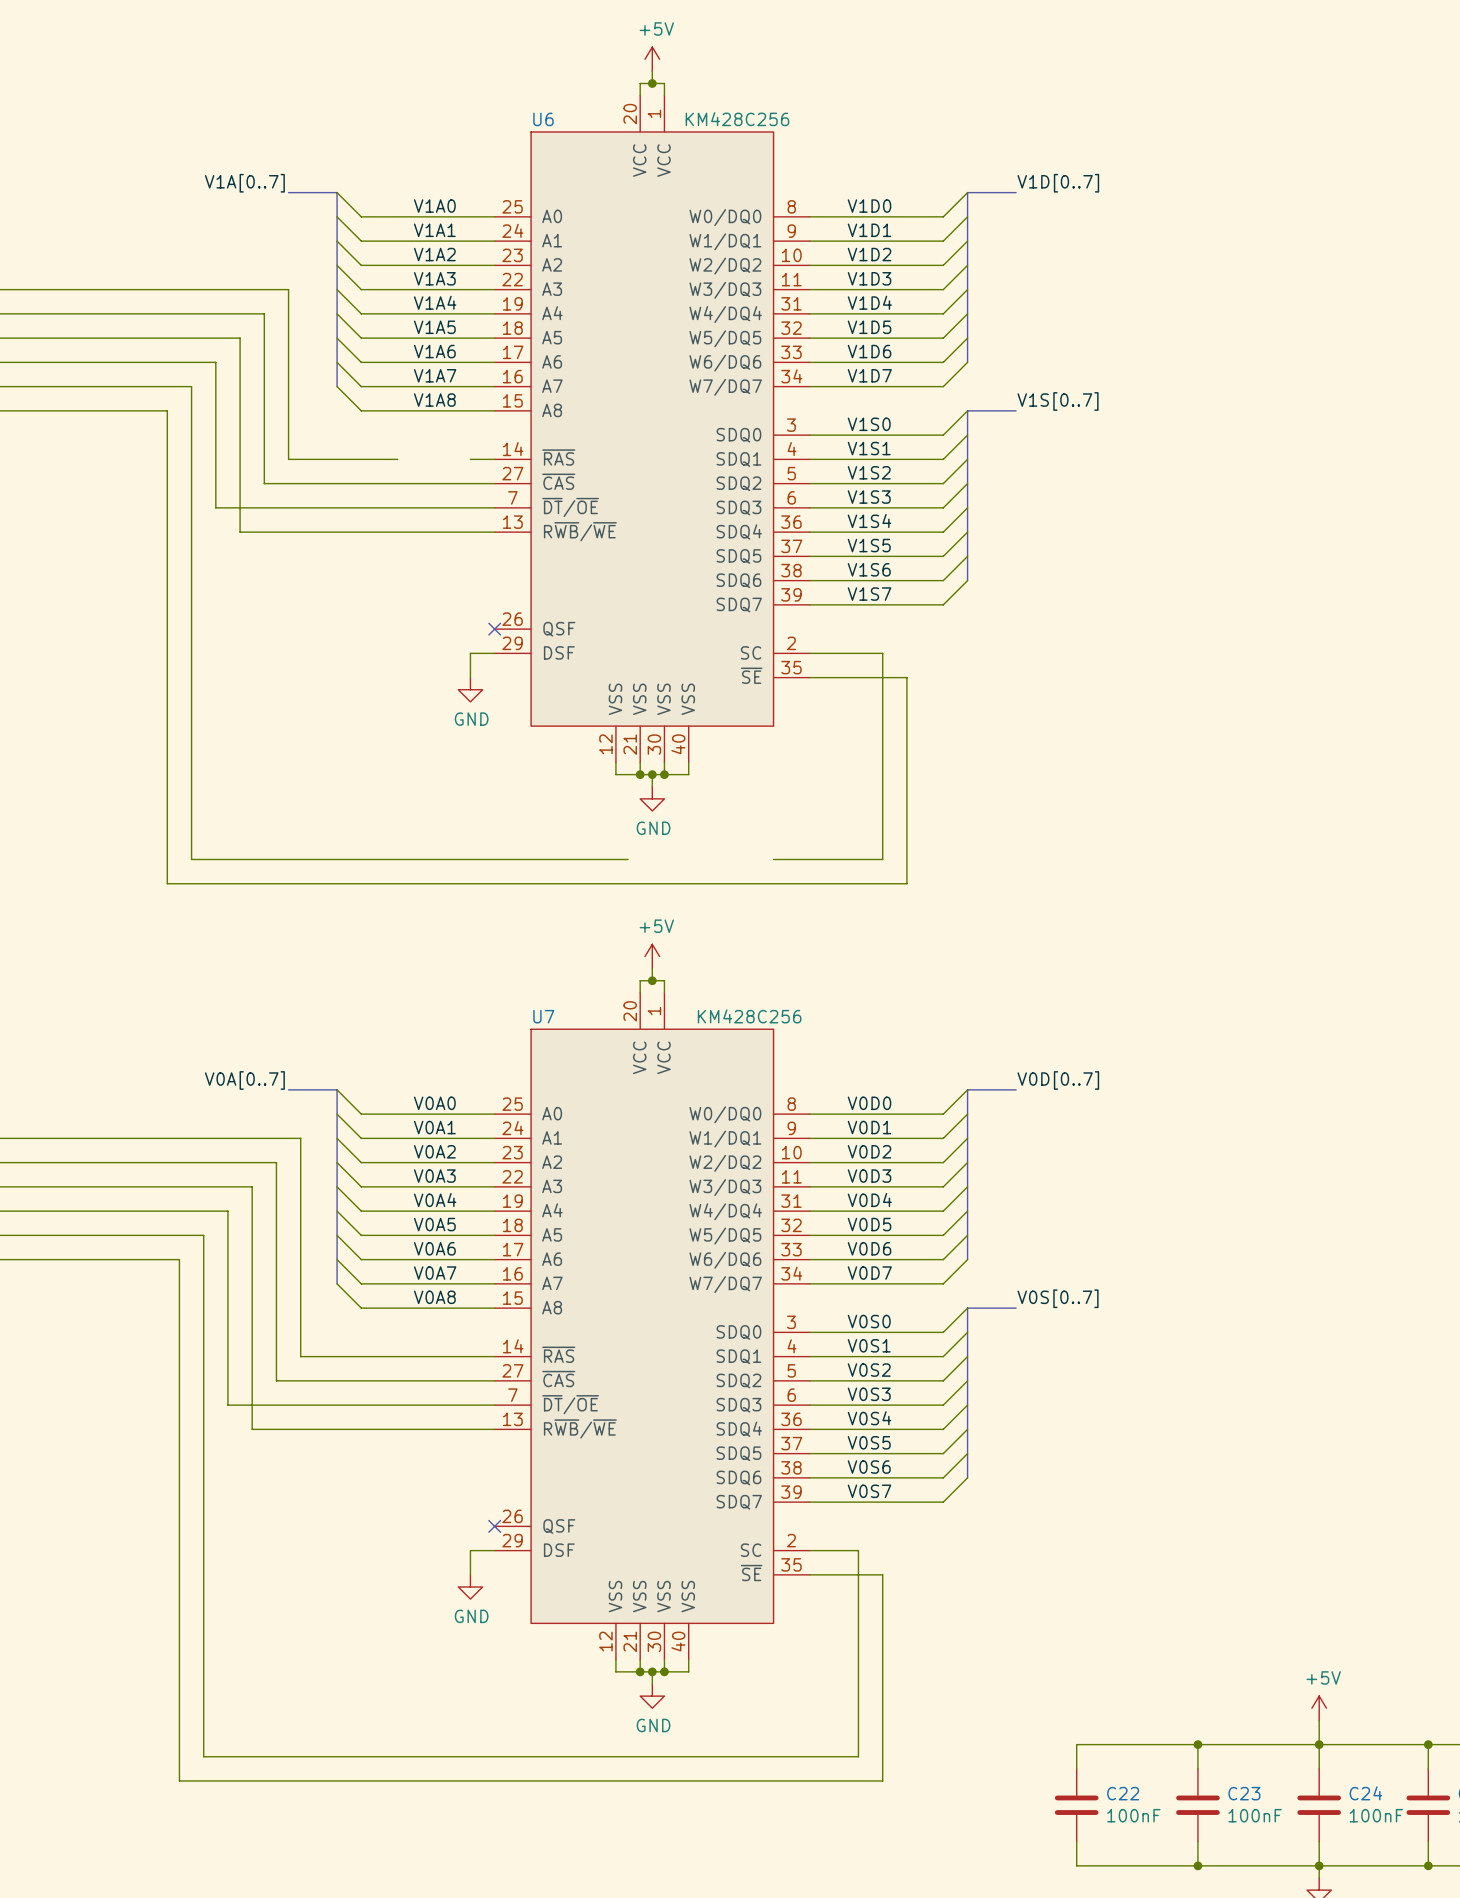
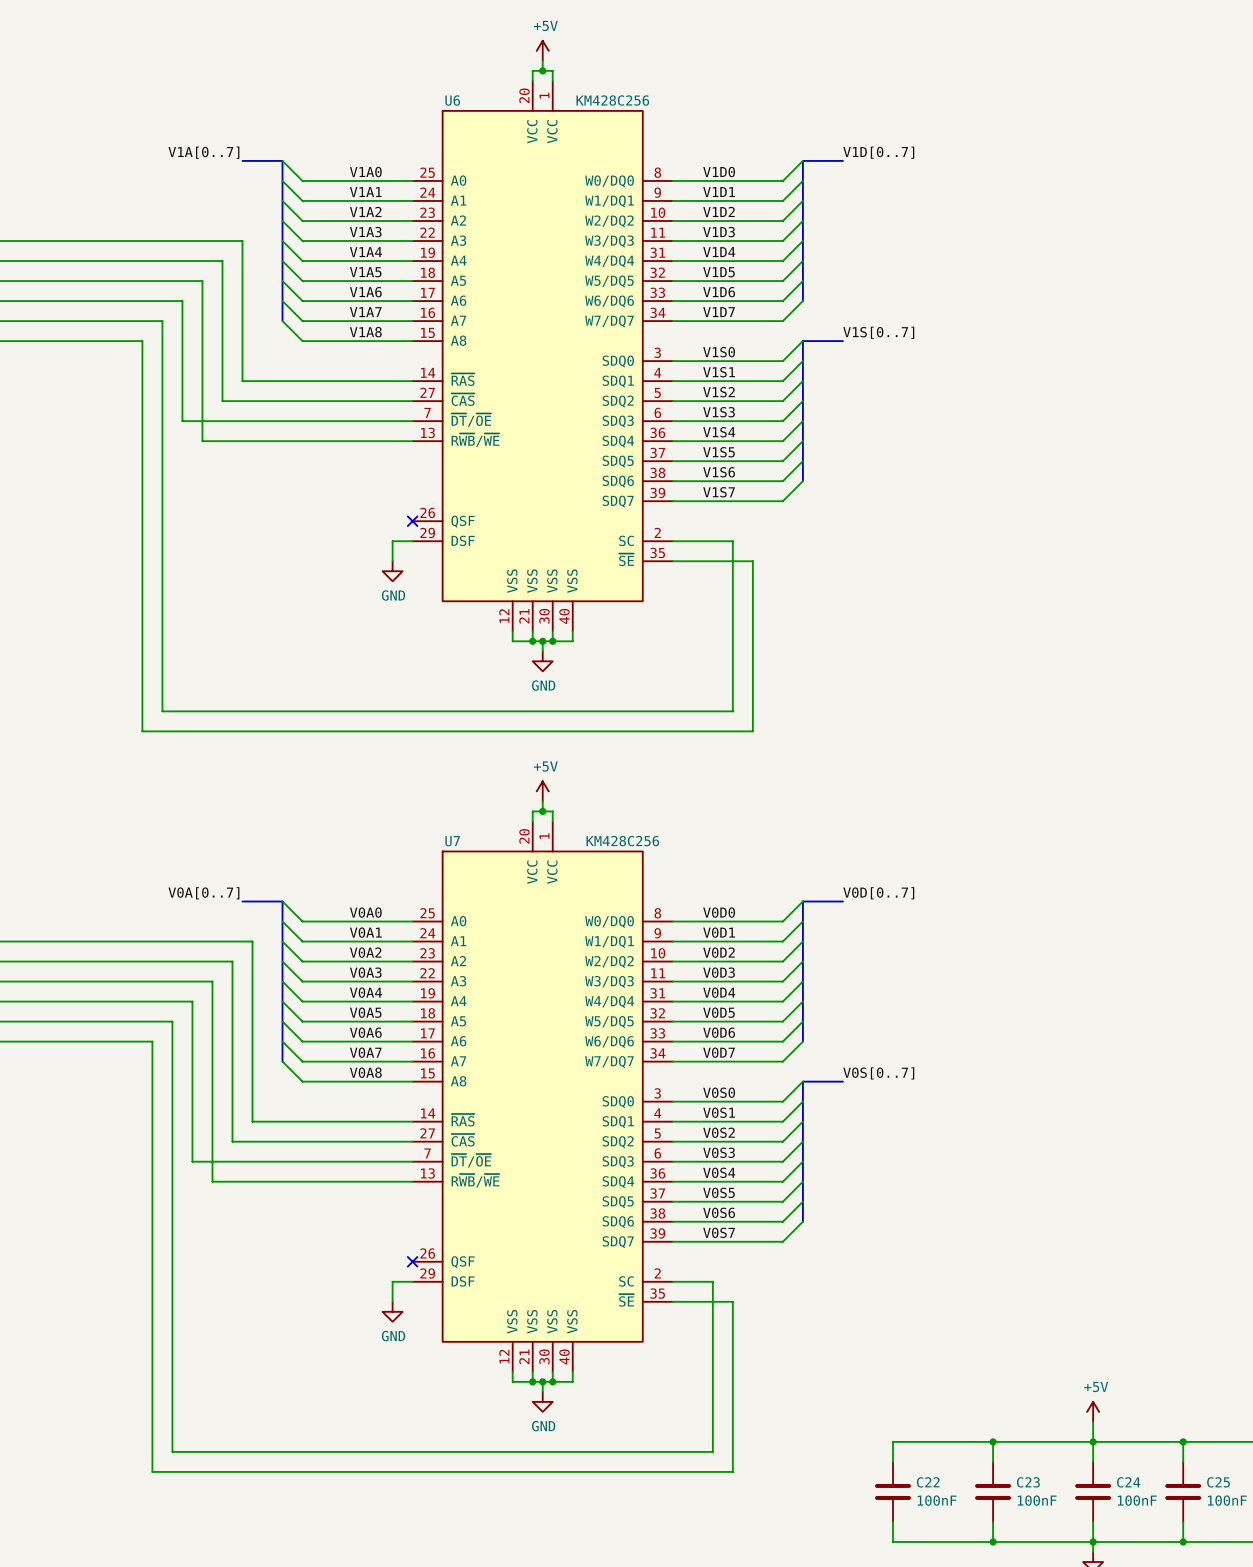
wire: none -> (332, 381) (392, 381)
wire: none -> (522, 711) (642, 711)

